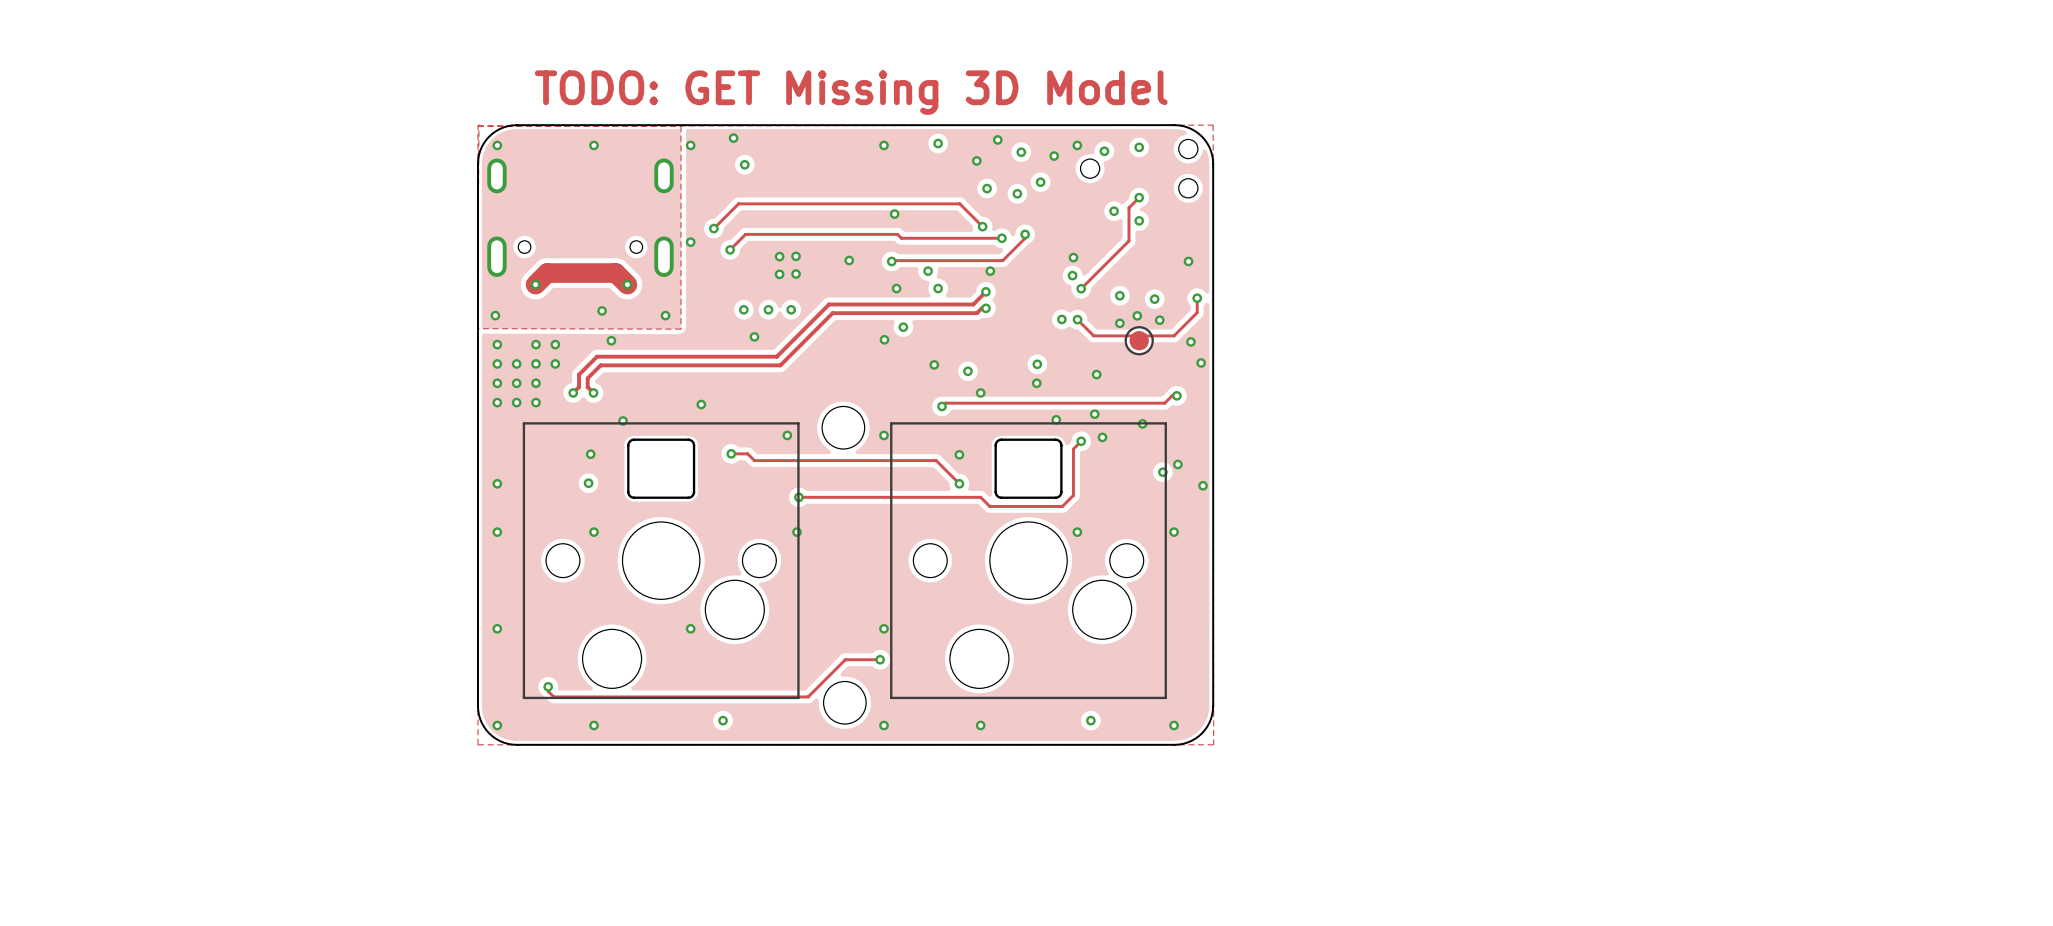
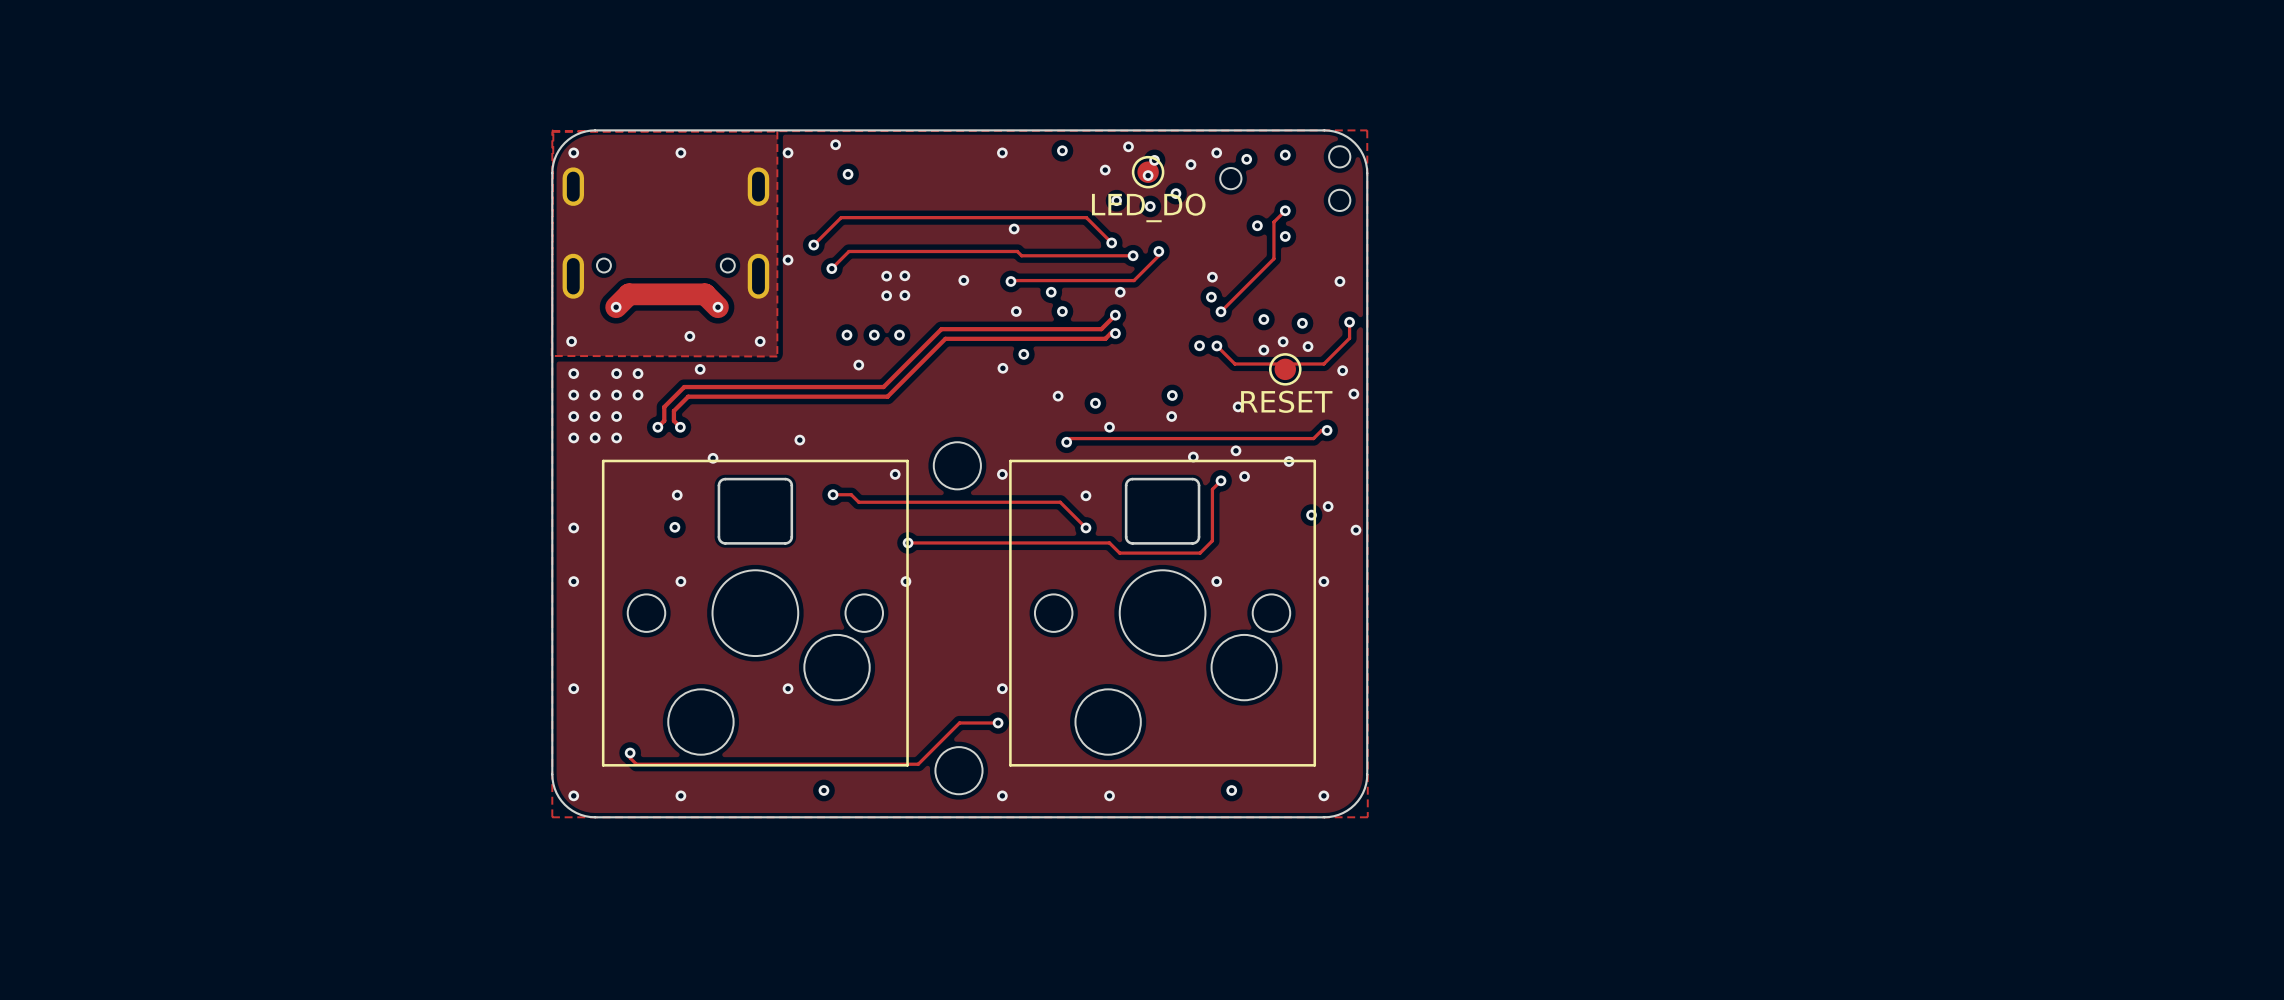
text: TODO: GET Missing 3D Model (851, 92) -> none
part: none -> LED_DO (1148, 172)
via: none -> (1148, 175)
part value: none -> RESET (1286, 401)

